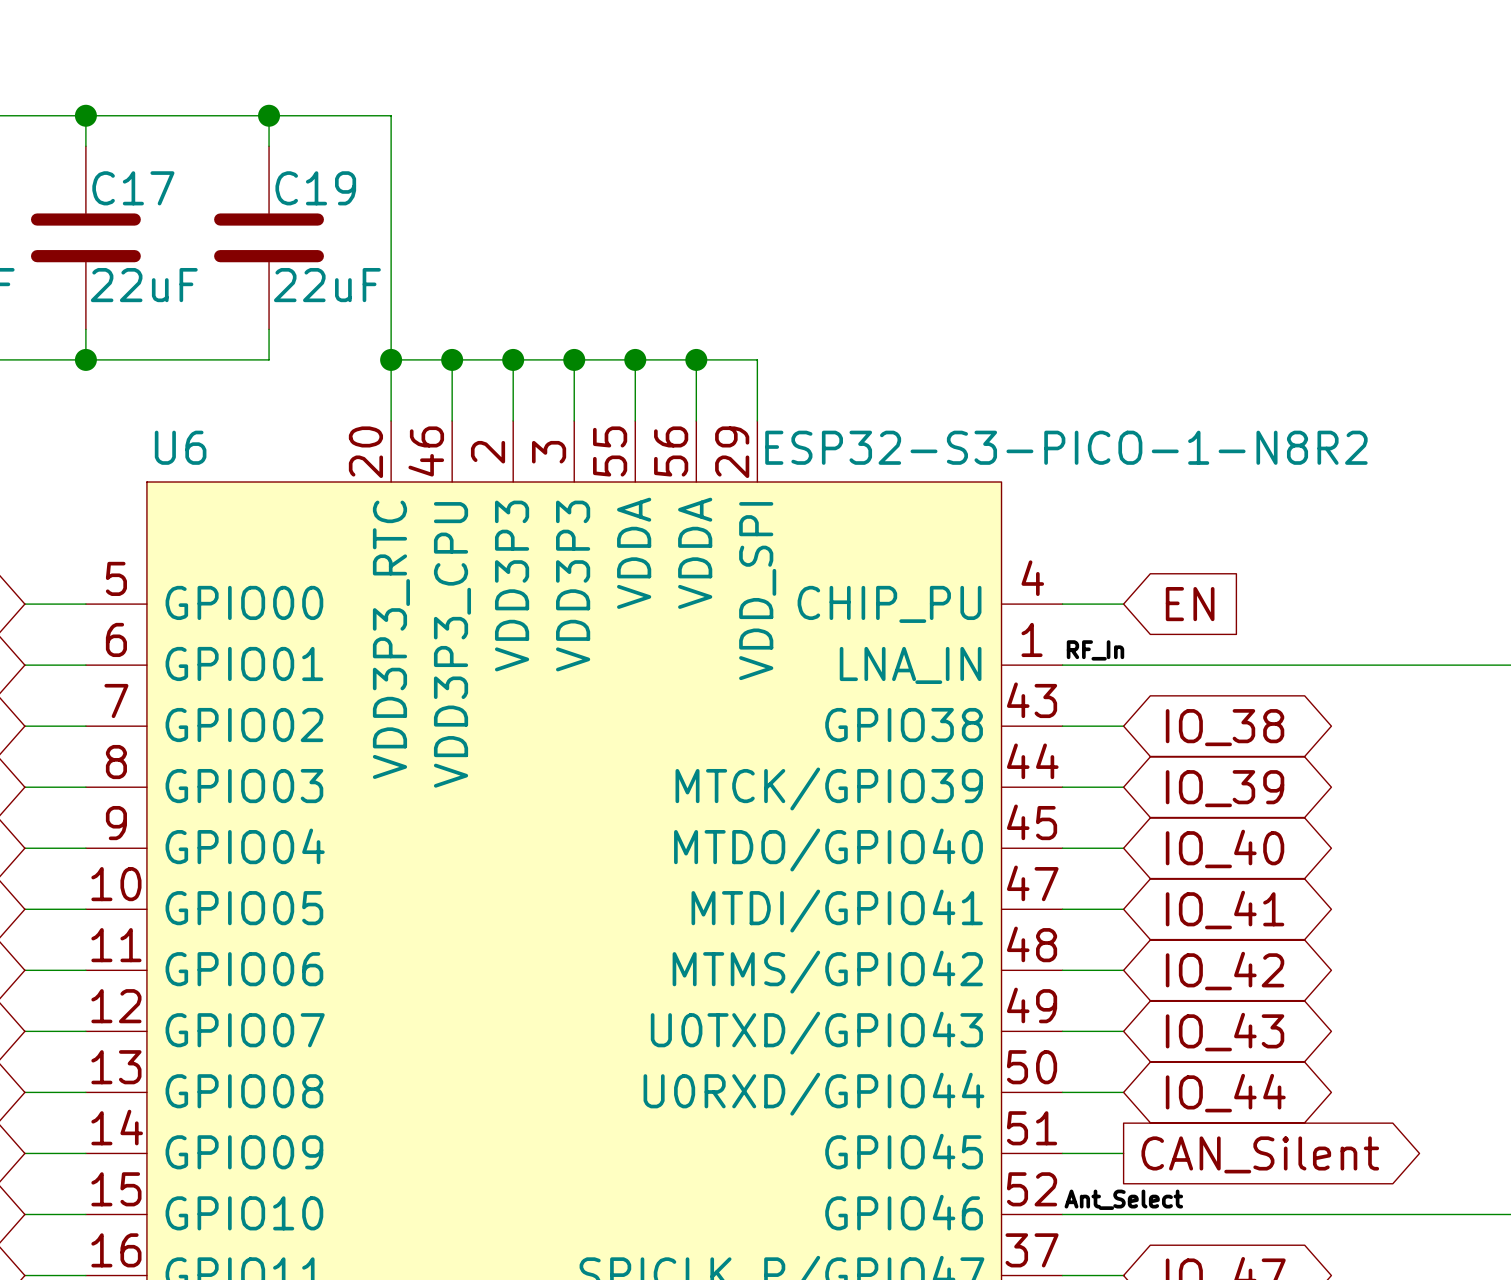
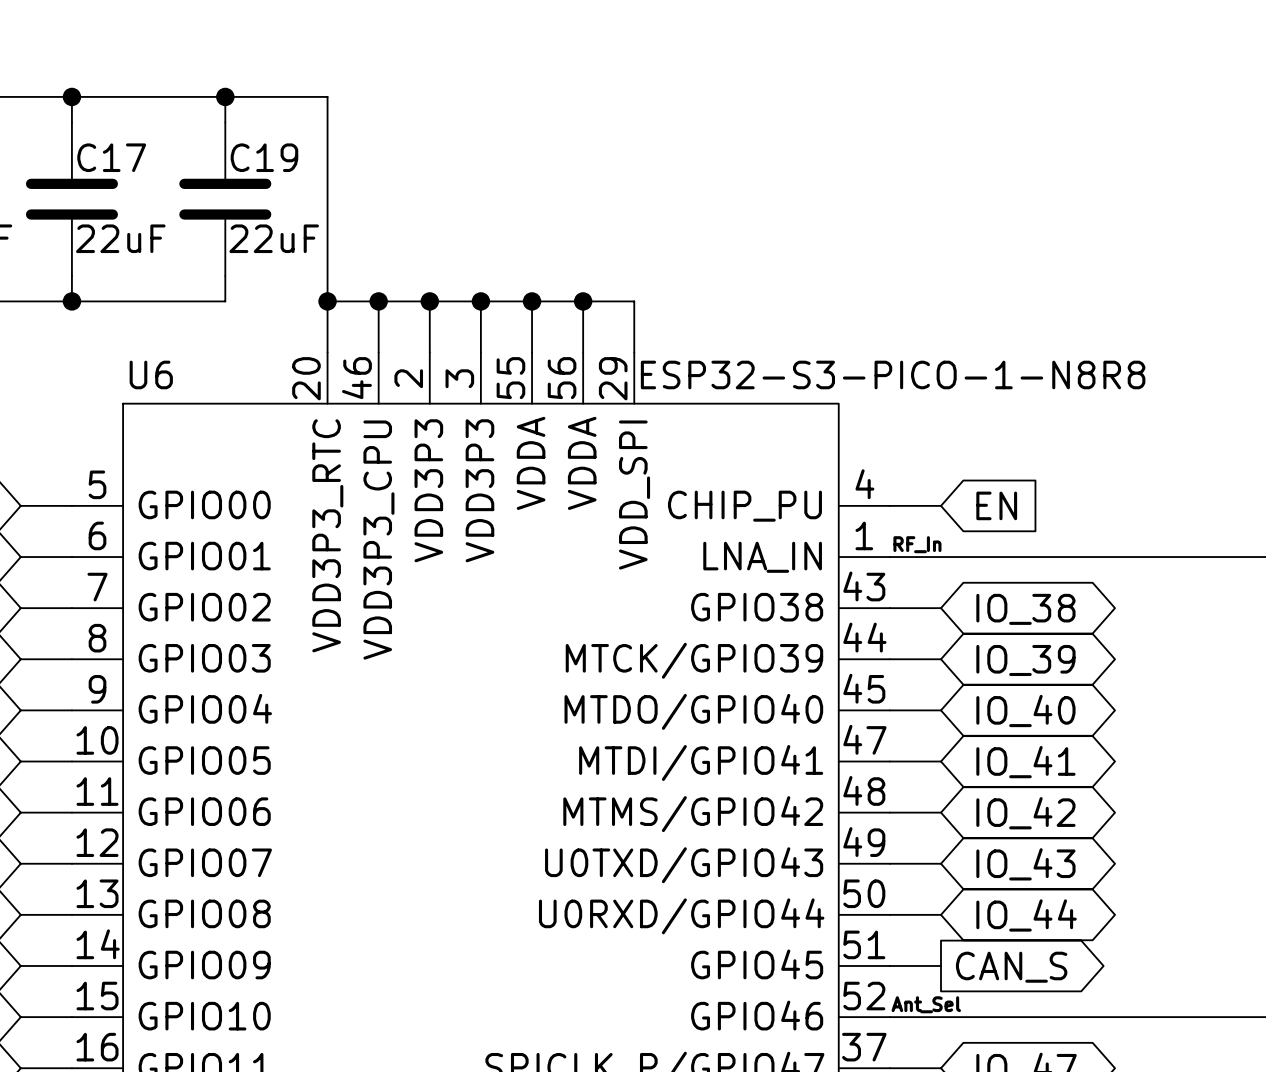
U6 value: ESP32-S3-PICO-1-N8R2 (1066, 447) -> ESP32-S3-PICO-1-N8R8 (893, 374)
global label: CAN_Silent (1260, 1154) -> CAN_S (1011, 967)
label: Ant_Select (1123, 1199) -> Ant_Sel (926, 1004)

